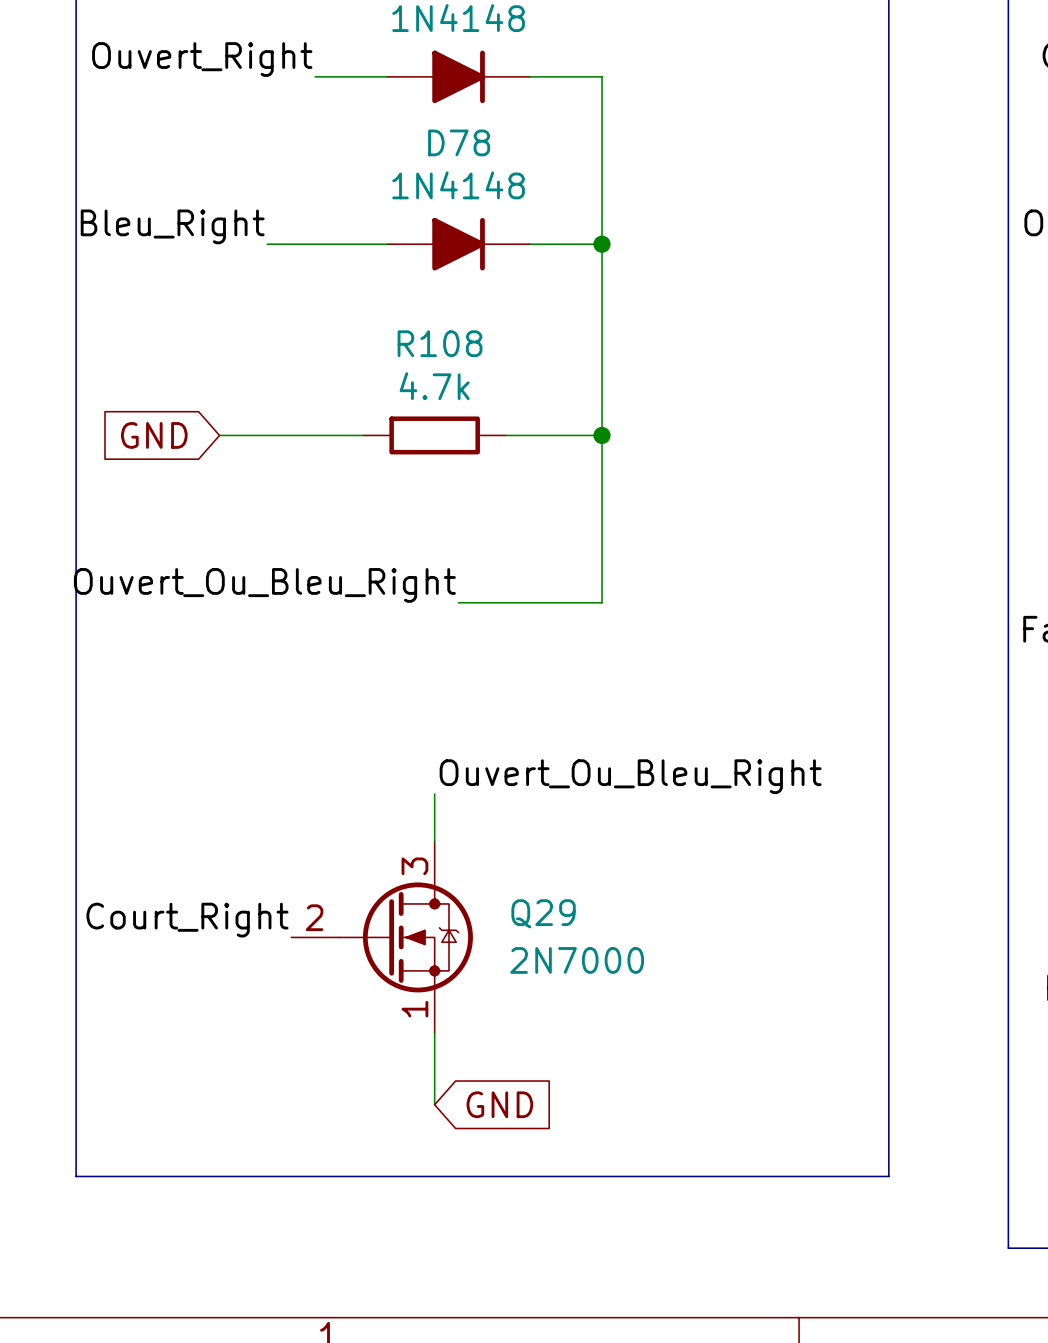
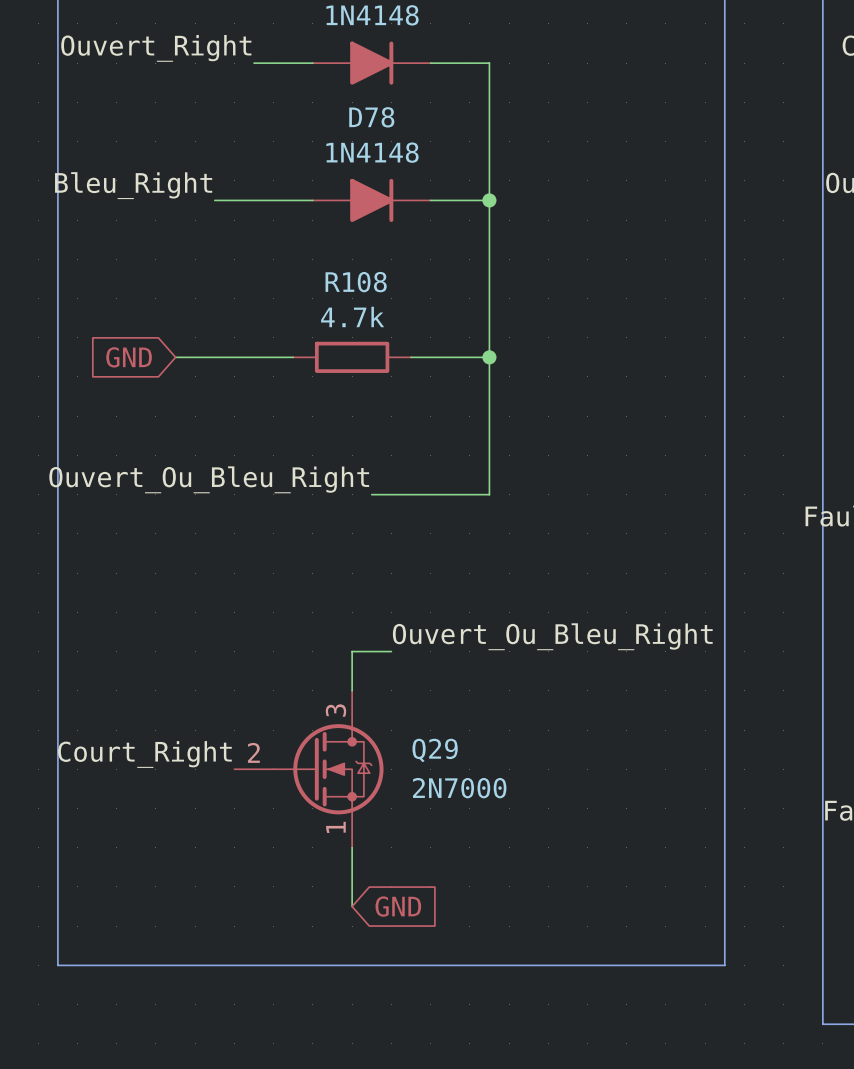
label position: Ouvert_Ou_Bleu_Right (630, 776) -> Ouvert_Ou_Bleu_Right (552, 636)
wire: none -> (352, 651) (391, 651)

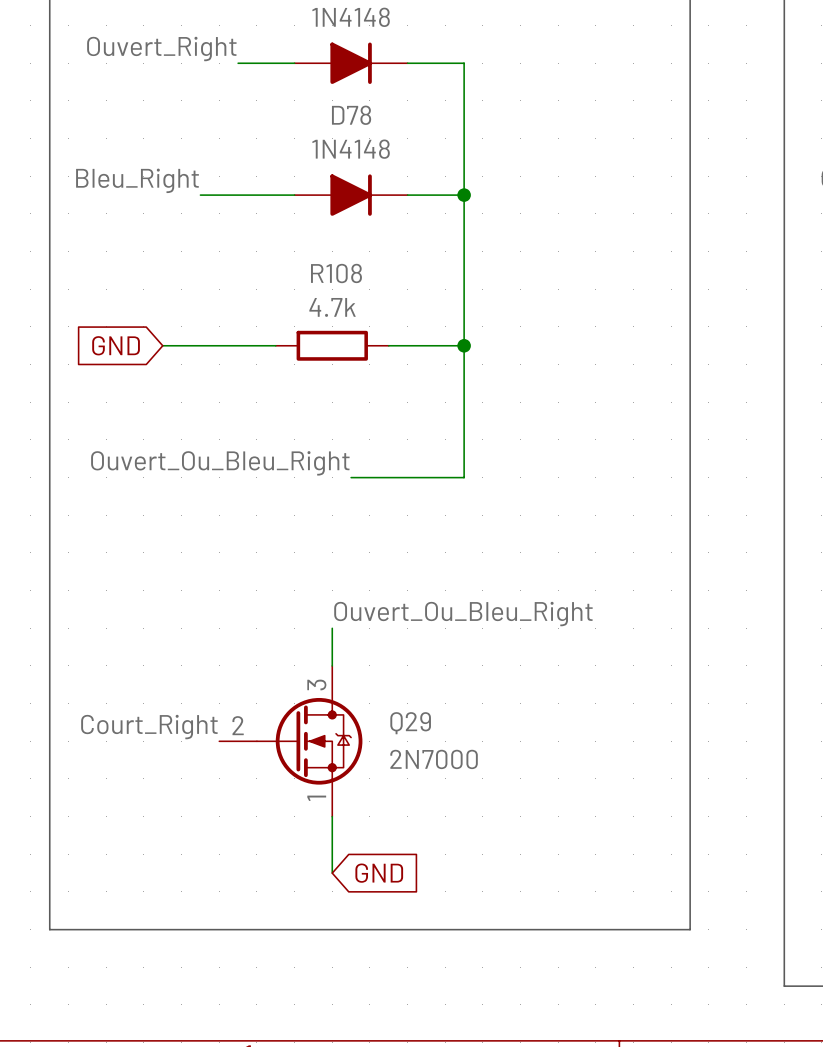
label position: Ouvert_Ou_Bleu_Right (552, 636) -> Ouvert_Ou_Bleu_Right (463, 614)
wire: (352, 651) (391, 651) -> none

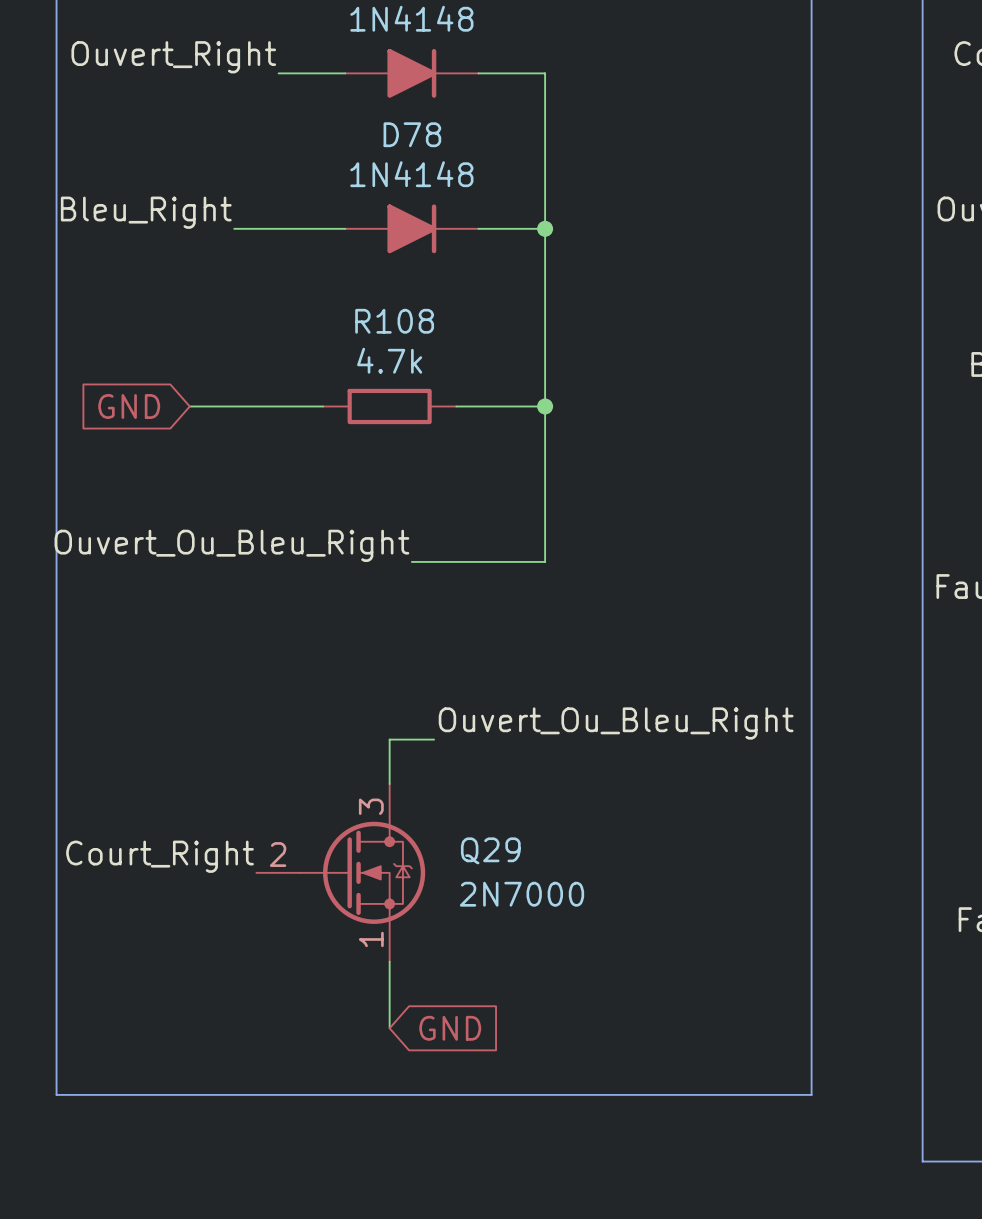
label position: Ouvert_Ou_Bleu_Right (463, 614) -> Ouvert_Ou_Bleu_Right (616, 723)
wire: none -> (389, 739) (434, 739)

